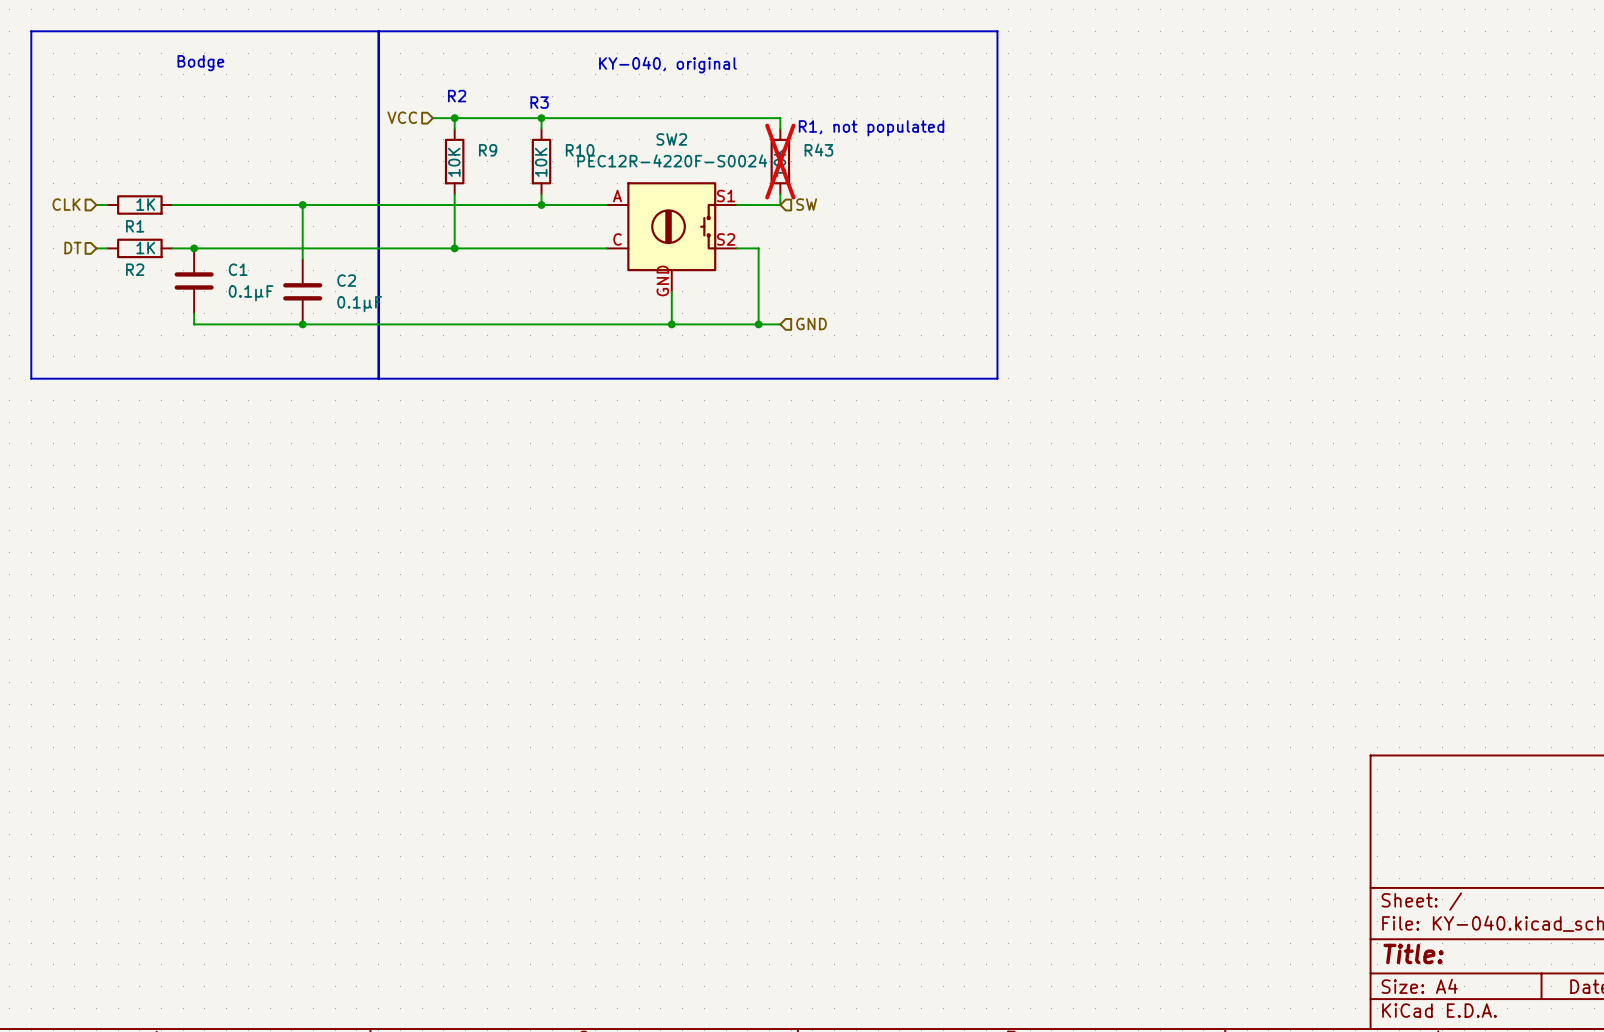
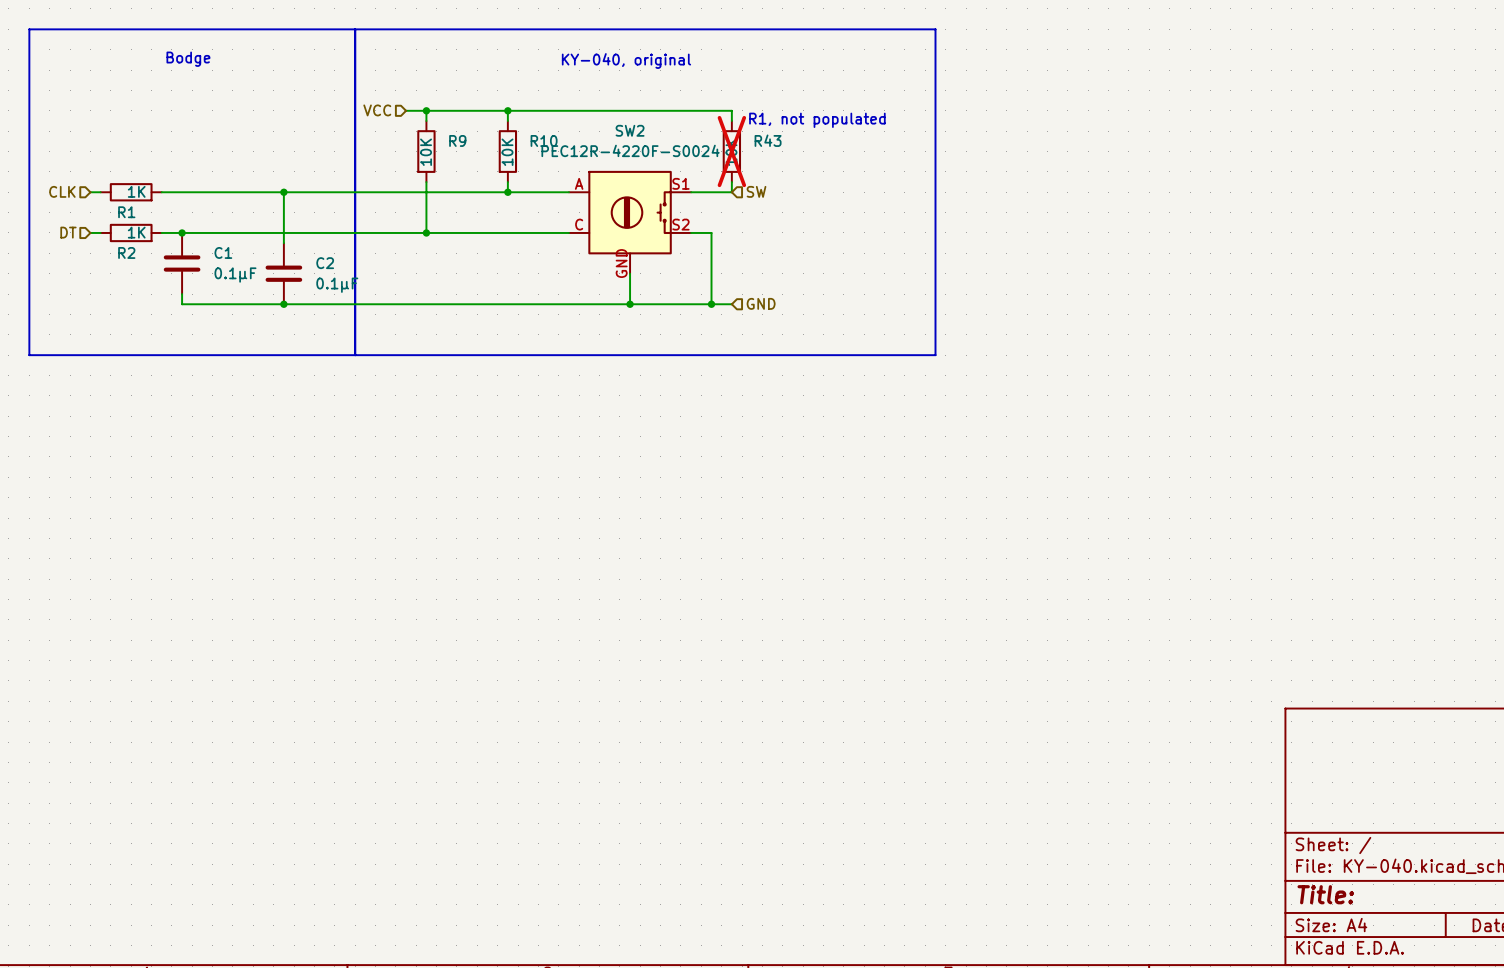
text: R2 (457, 96) -> none
text: R3 (539, 102) -> none

